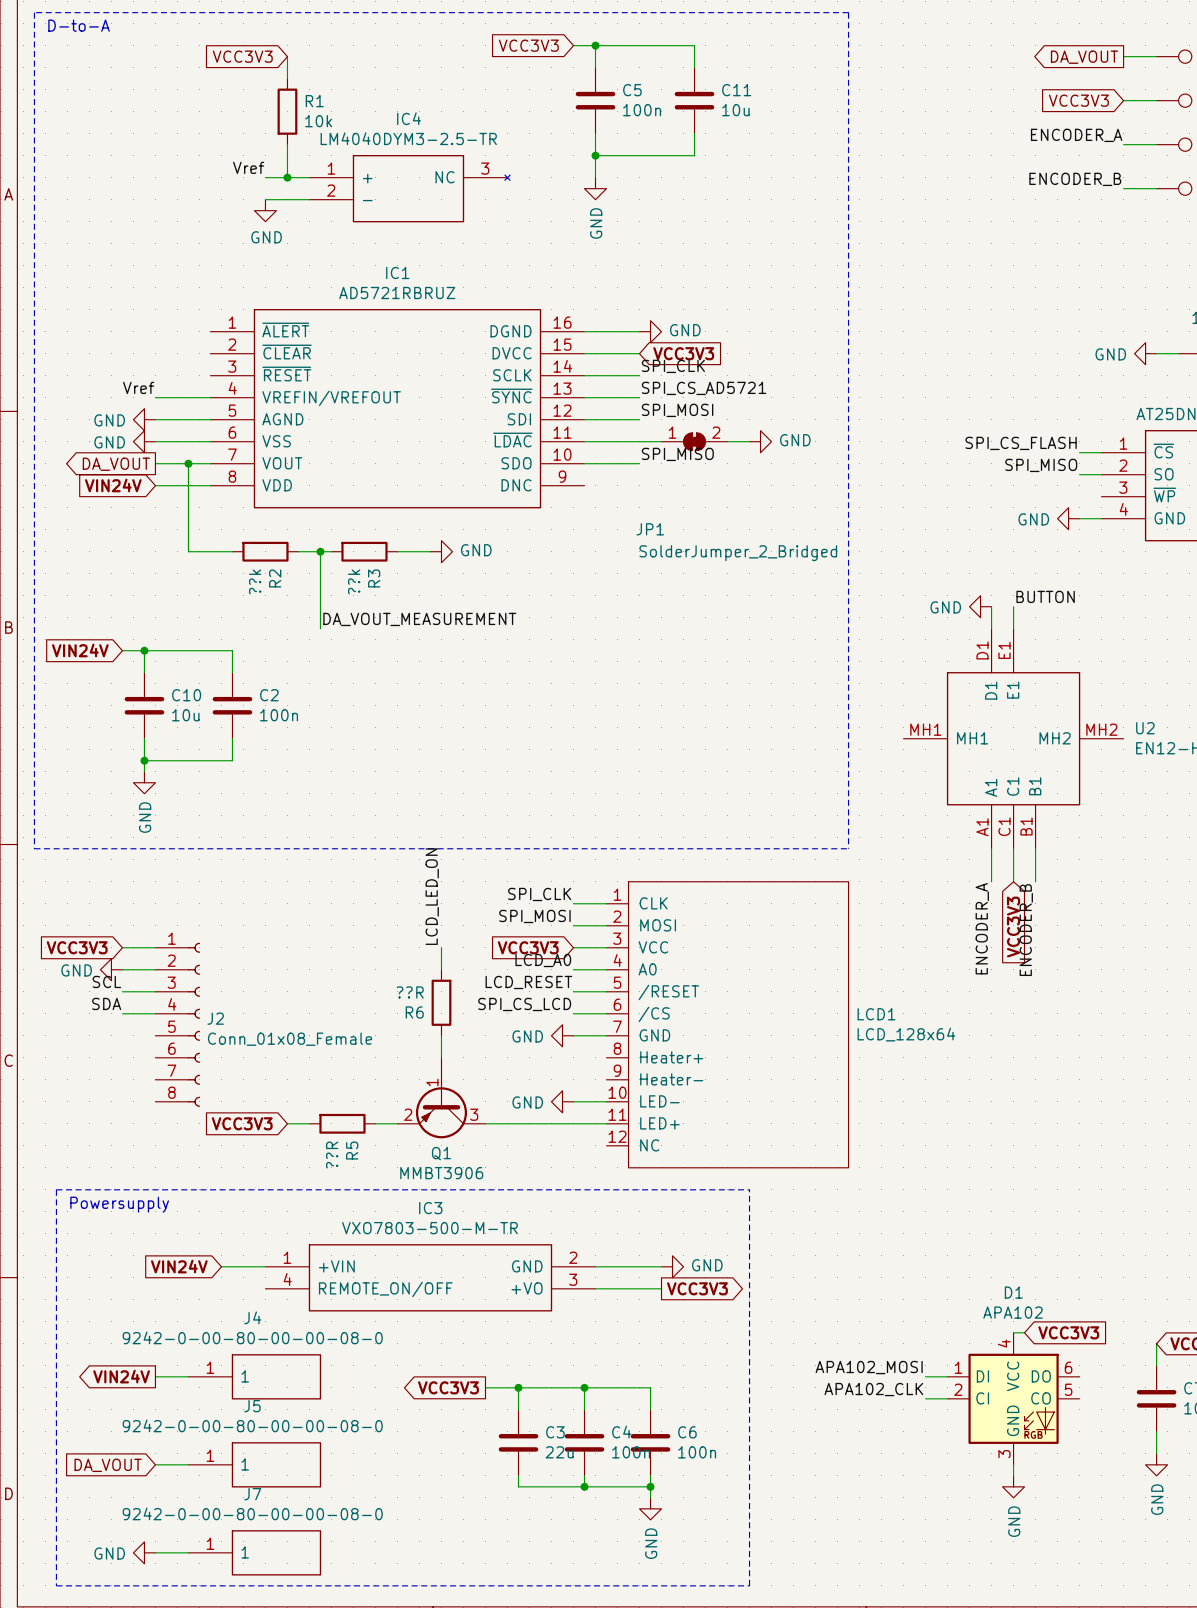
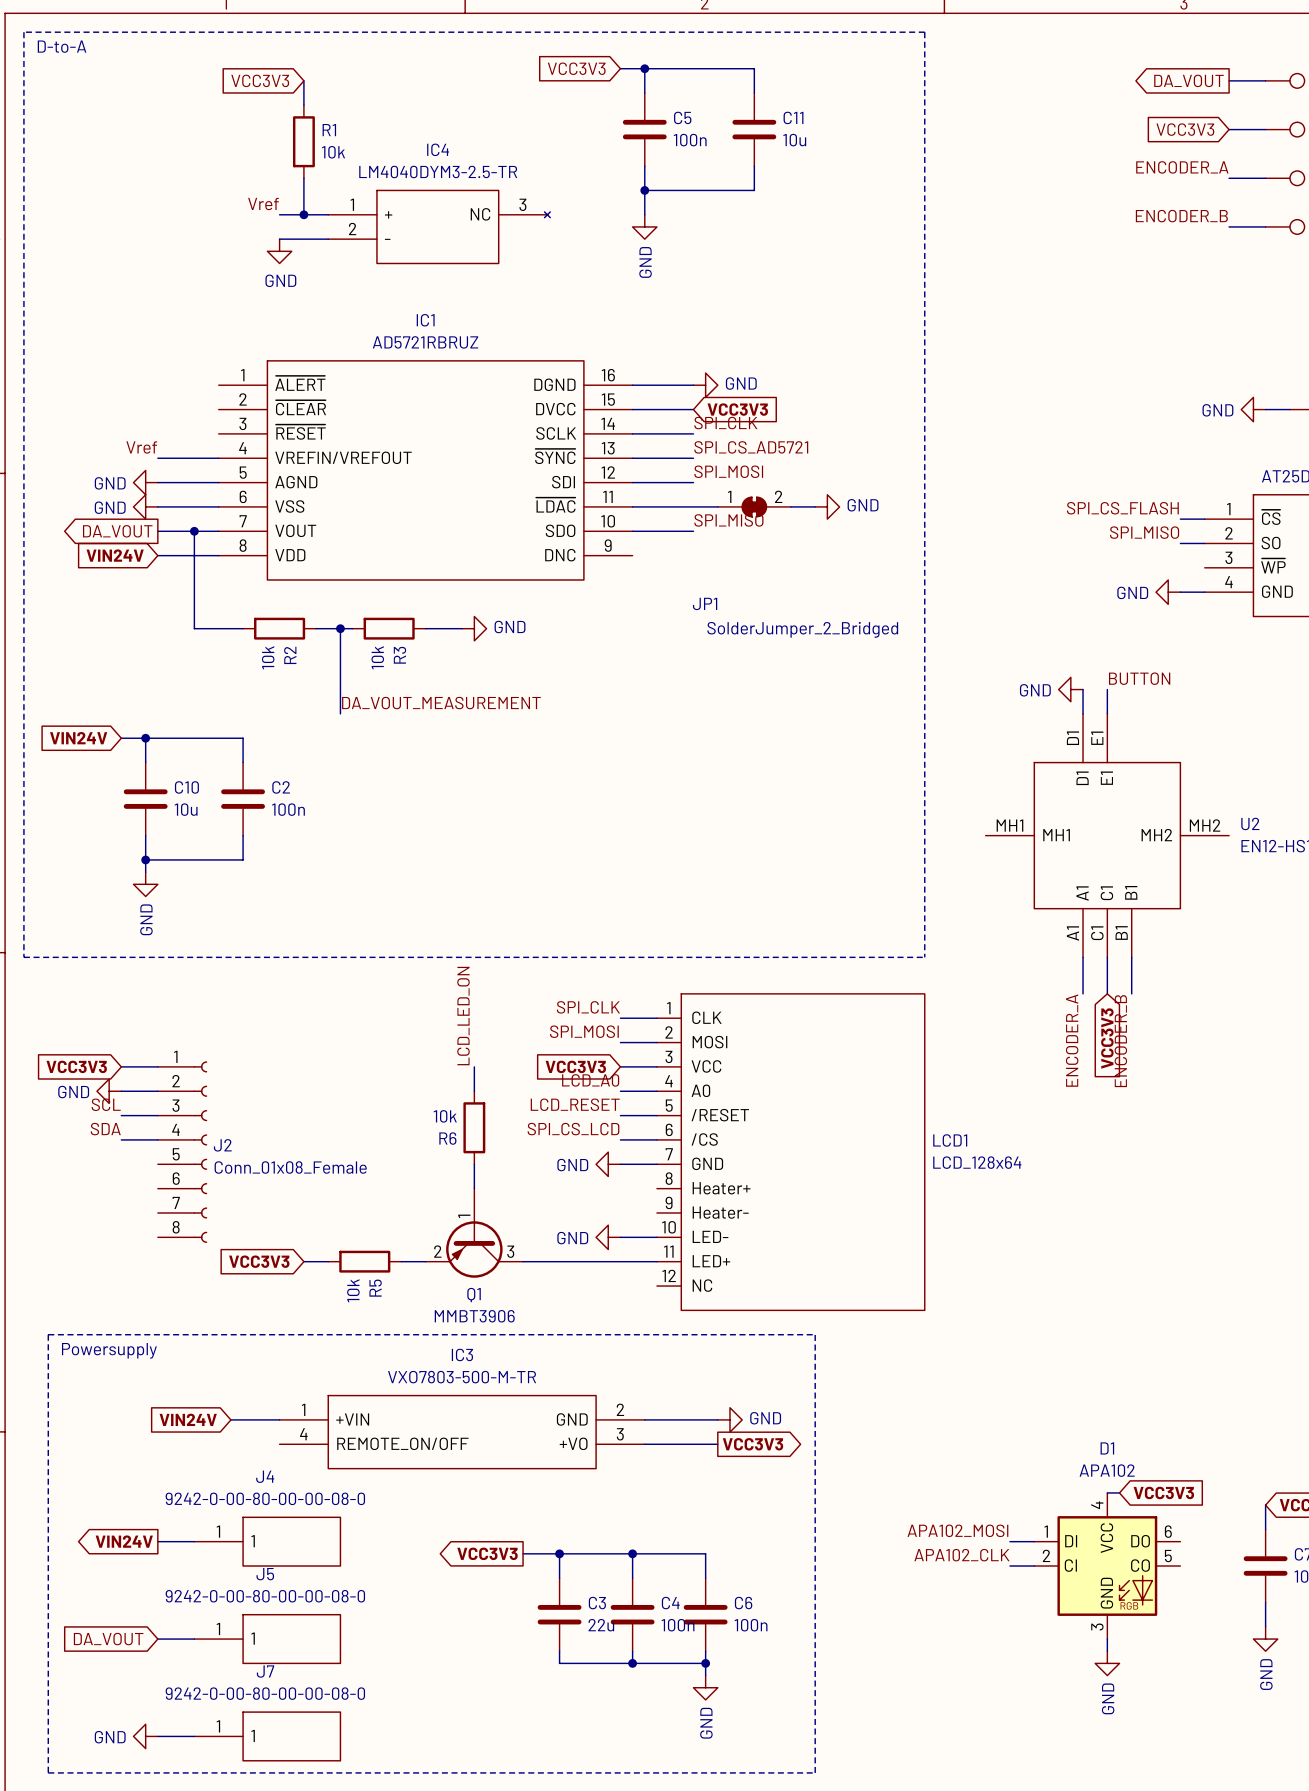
R2 value: ??k (255, 581) -> 10k (268, 657)
R3 value: ??k (354, 581) -> 10k (377, 657)
R6 value: ??R (410, 992) -> 10k (445, 1116)
R5 value: ??R (332, 1155) -> 10k (353, 1290)

